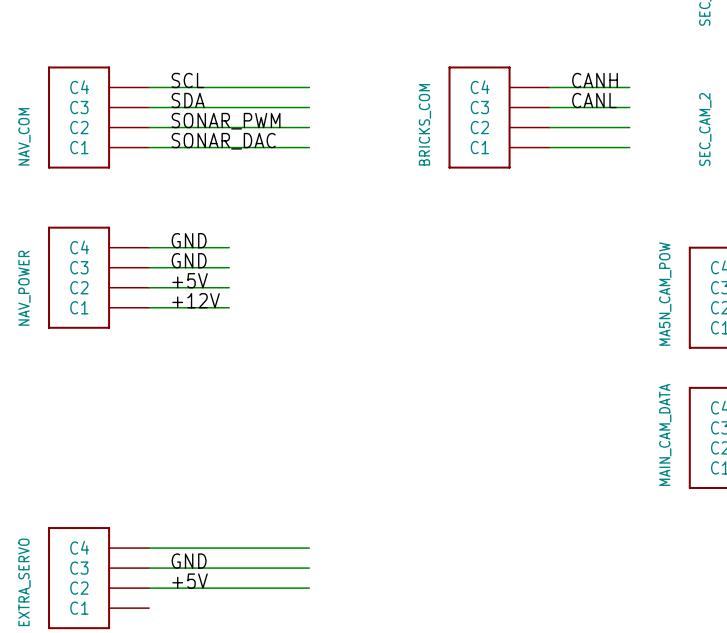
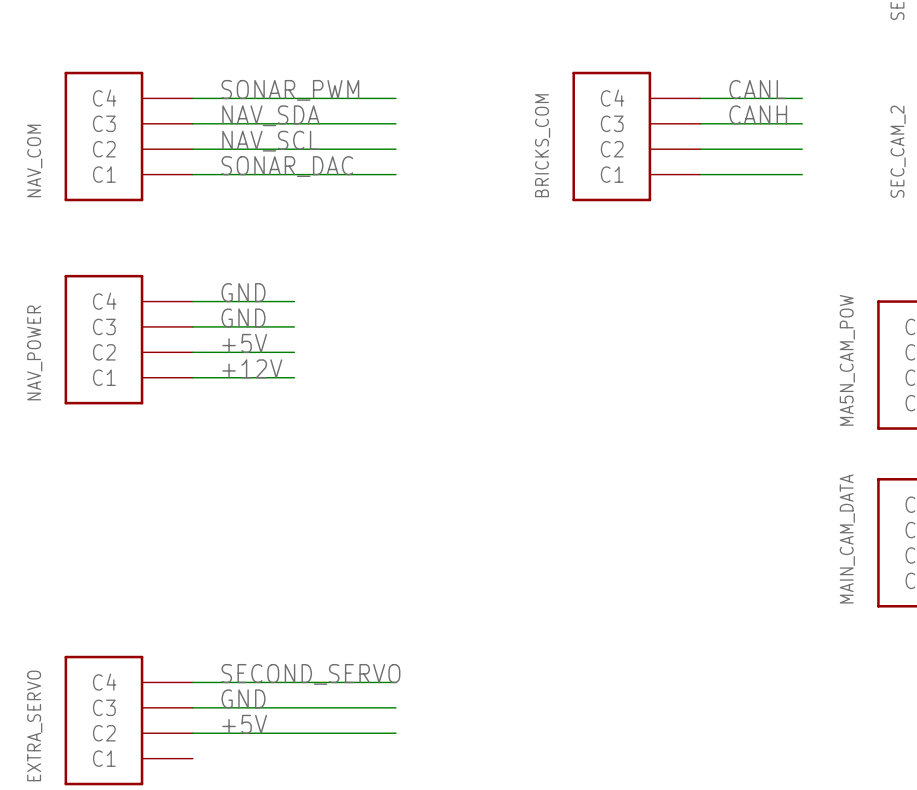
label: SCL (187, 80) -> SONAR_PWM (290, 90)
label: CANH (595, 80) -> CANL (757, 89)
label: SDA (188, 100) -> NAV_SDA (270, 115)
label: CANL (594, 100) -> CANH (758, 114)
label: SONAR_PWM (226, 121) -> NAV_SCL (270, 141)
label: none -> SECOND_SERVO (310, 674)

